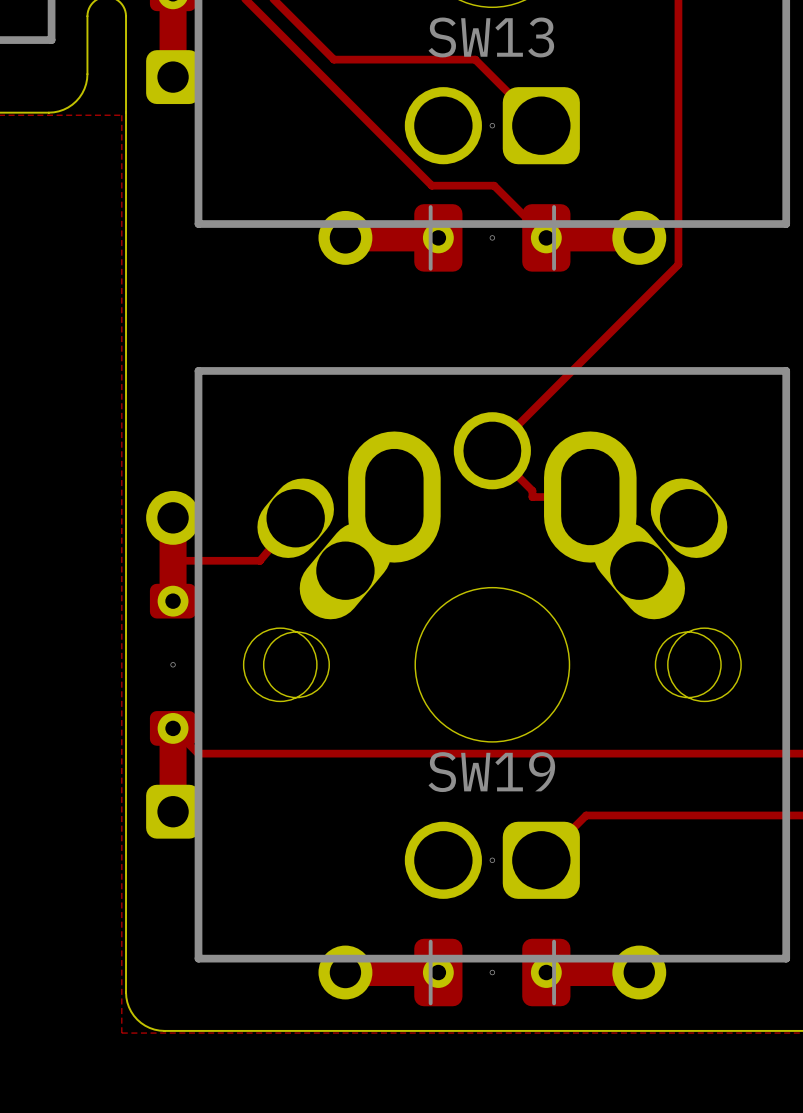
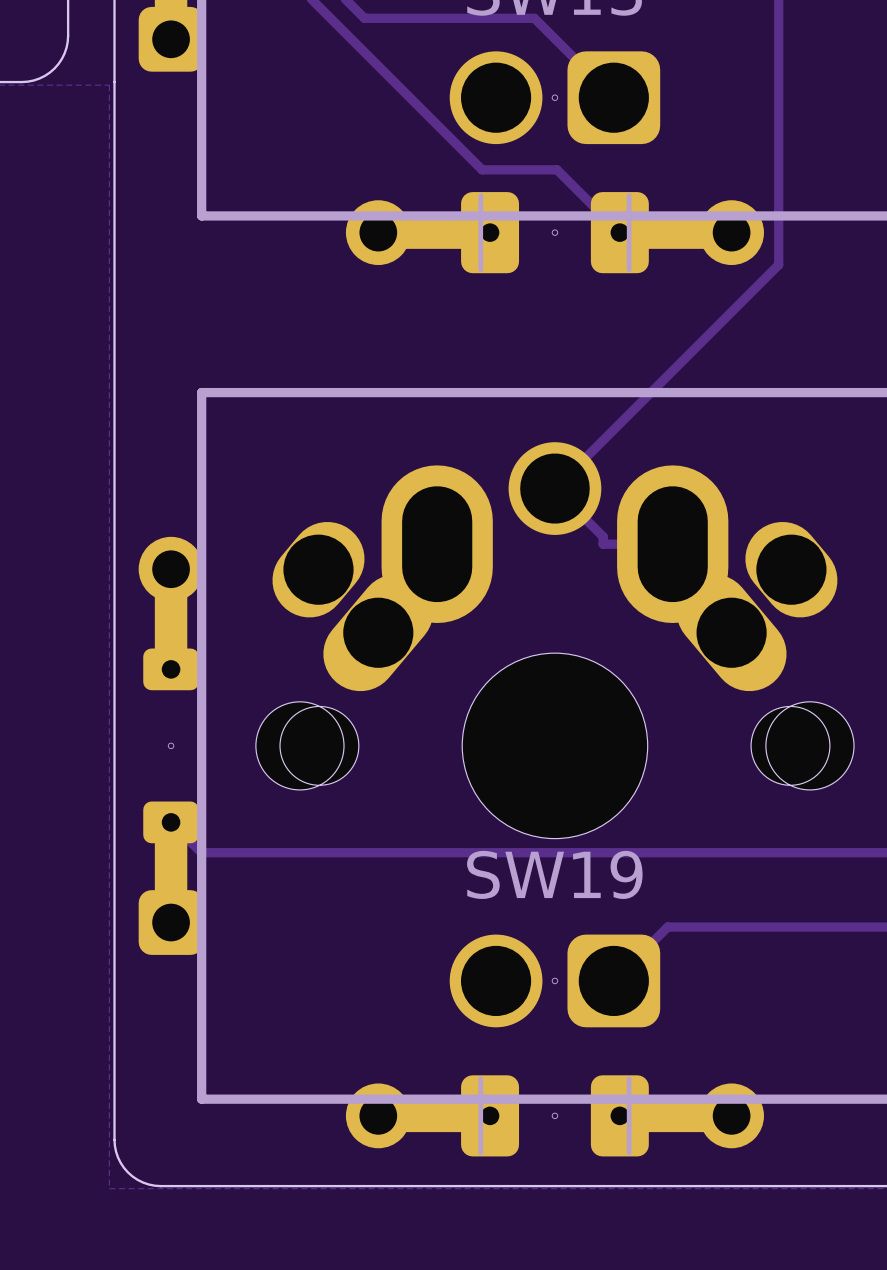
track: (295, 518) (259, 560) (173, 560) -> none

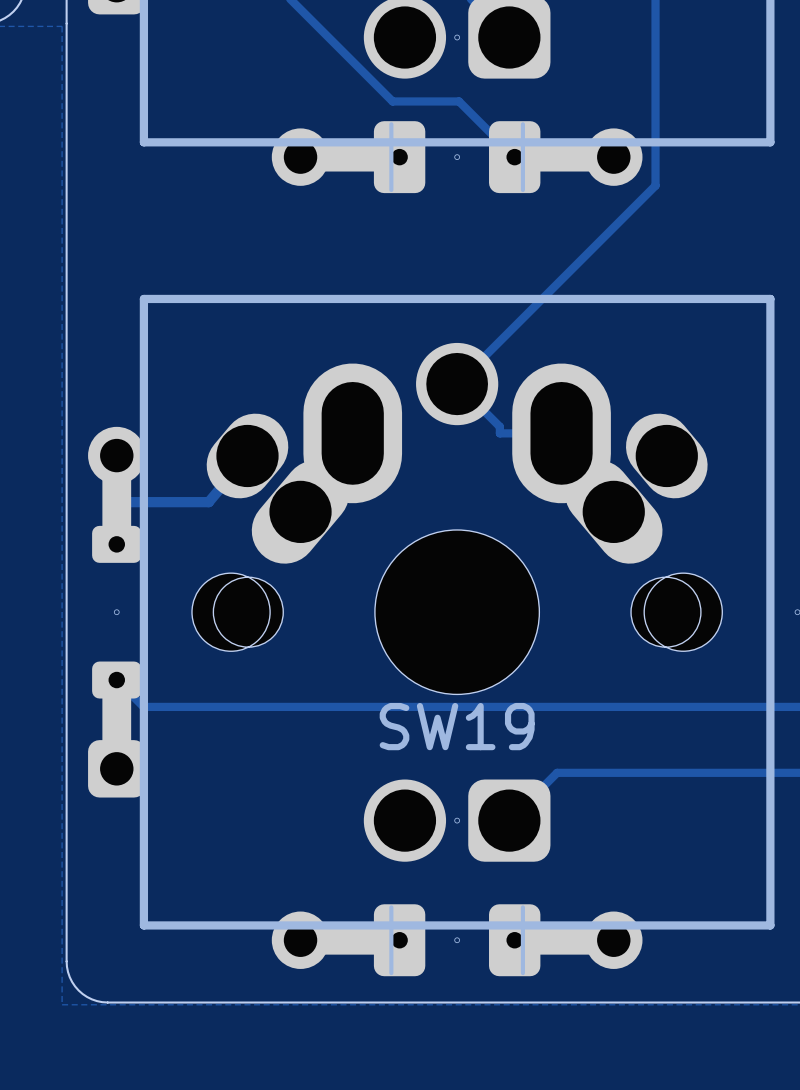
track: none -> (247, 455) (208, 502) (116, 502)

